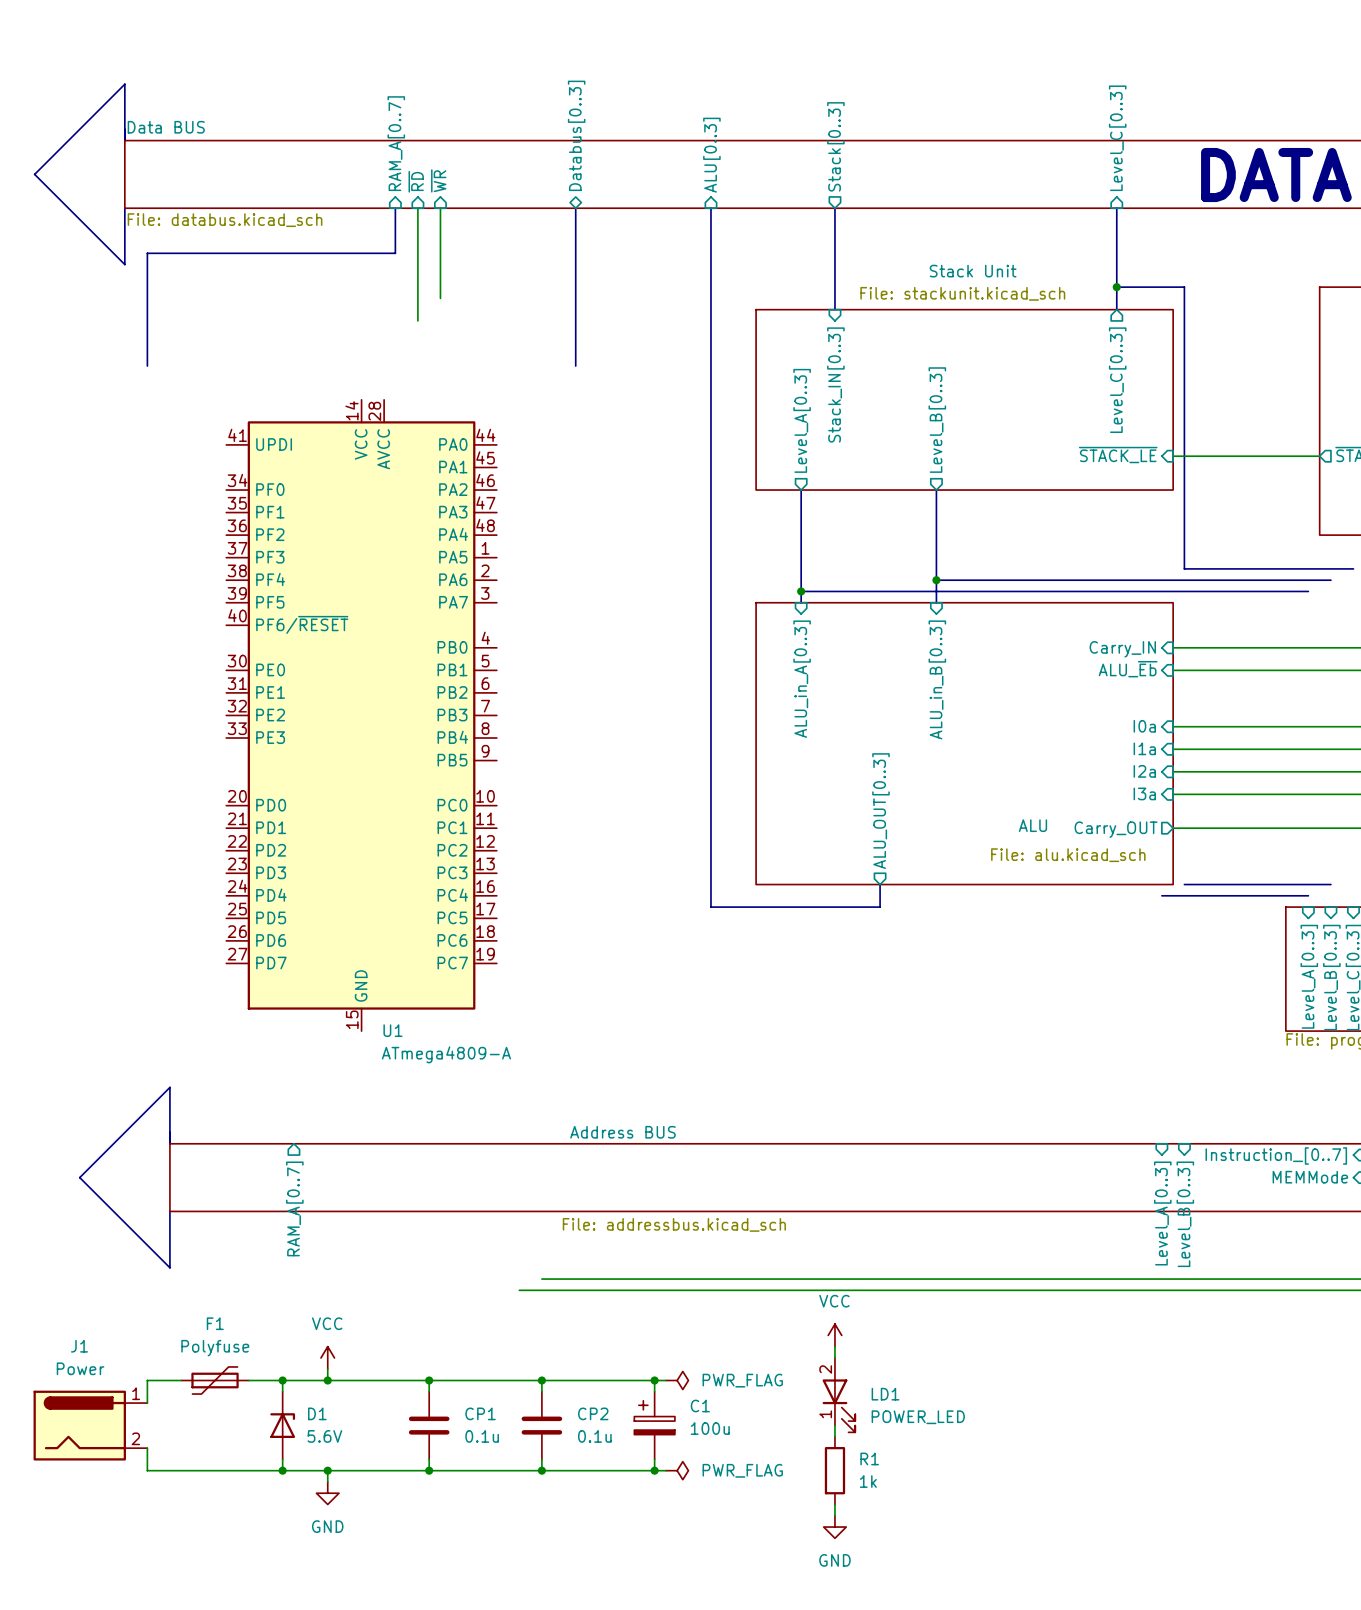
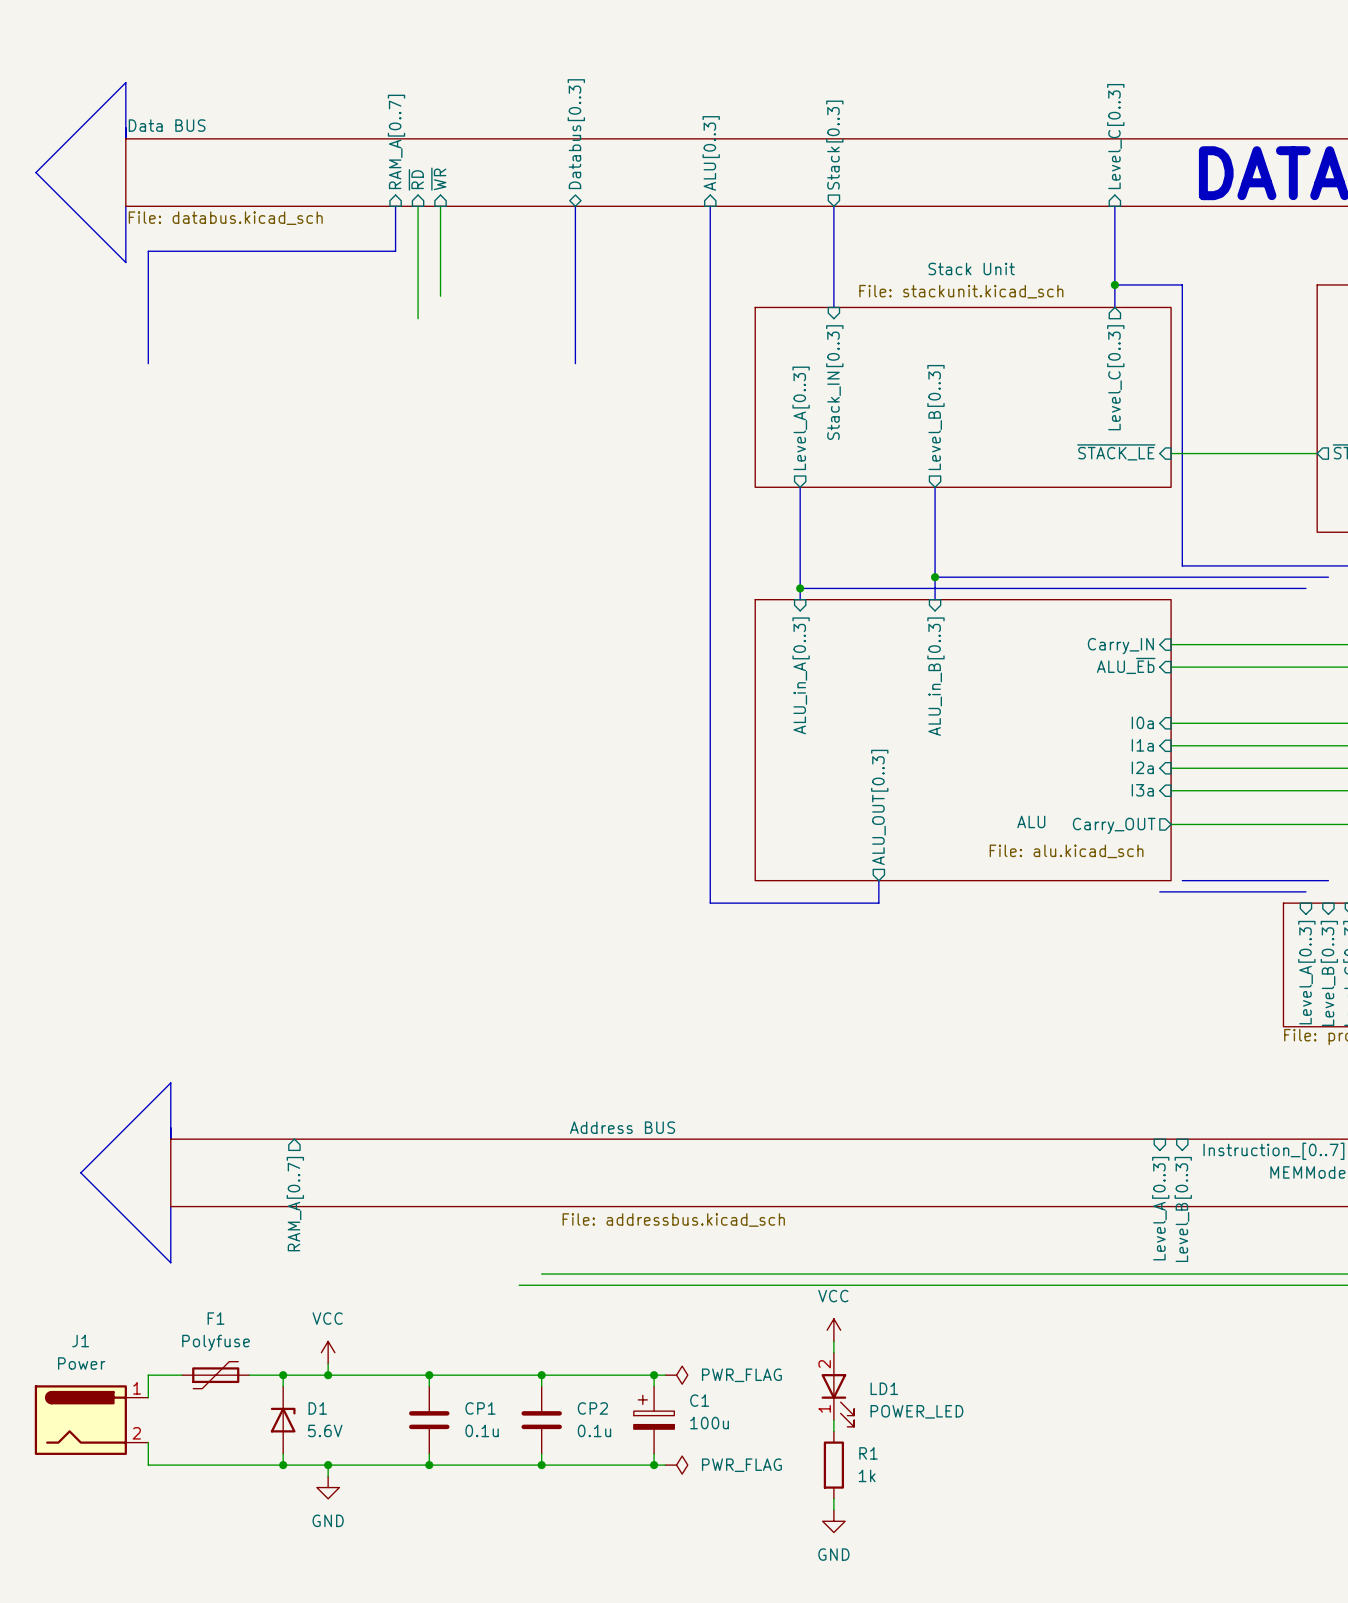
U1: ATmega4809-A (361, 715) -> none

